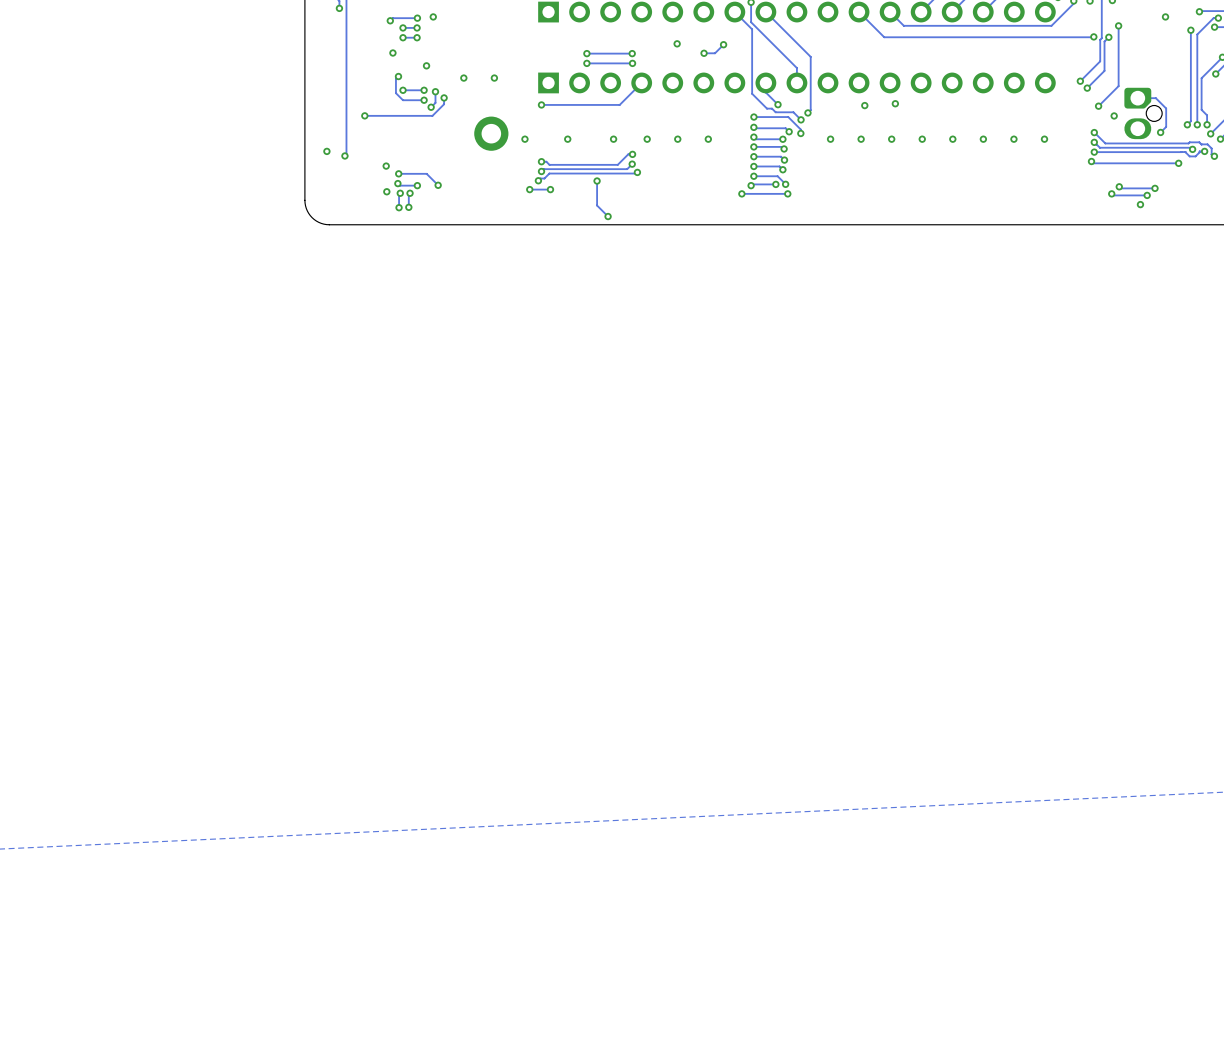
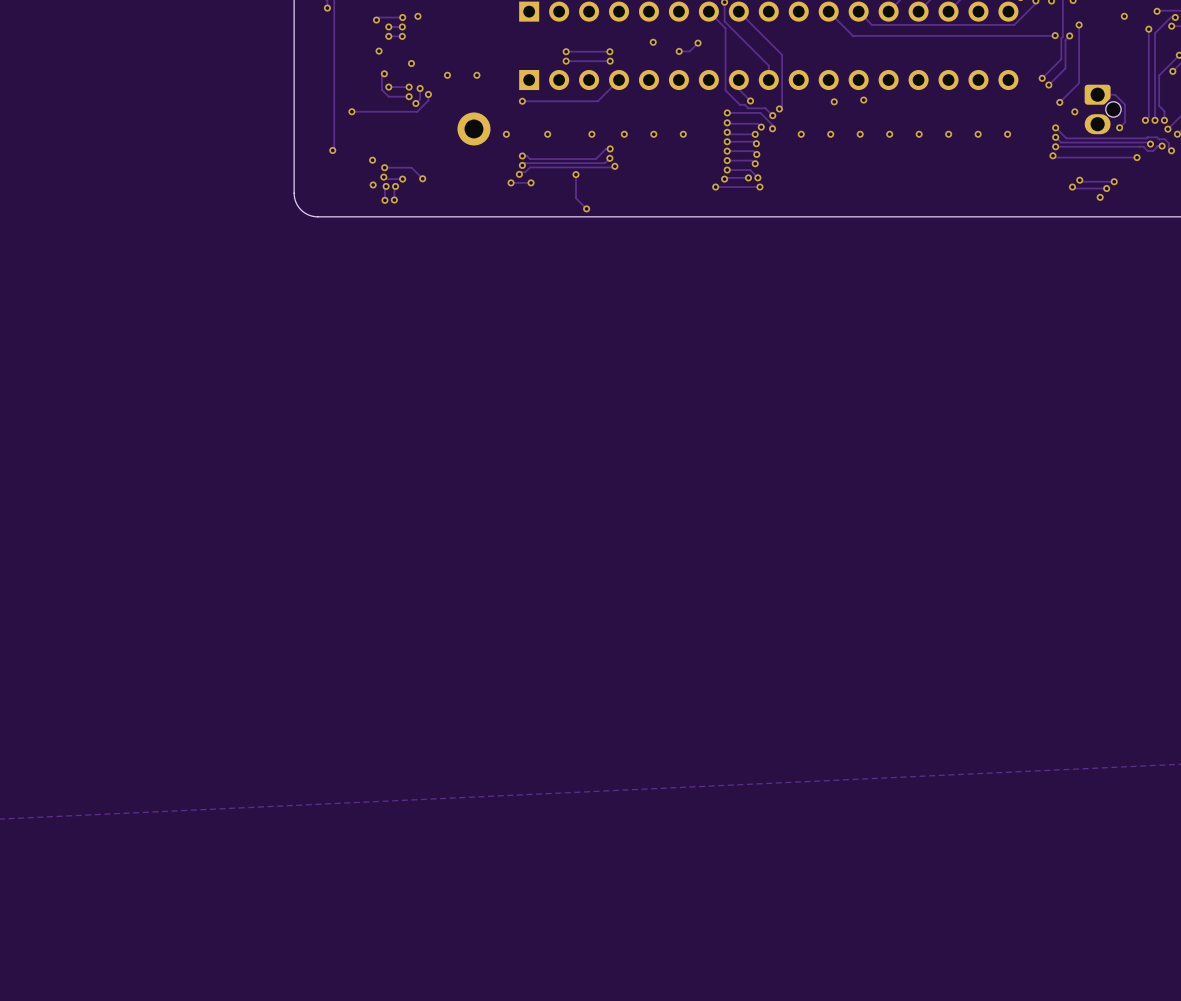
via: (326, 151) -> none

